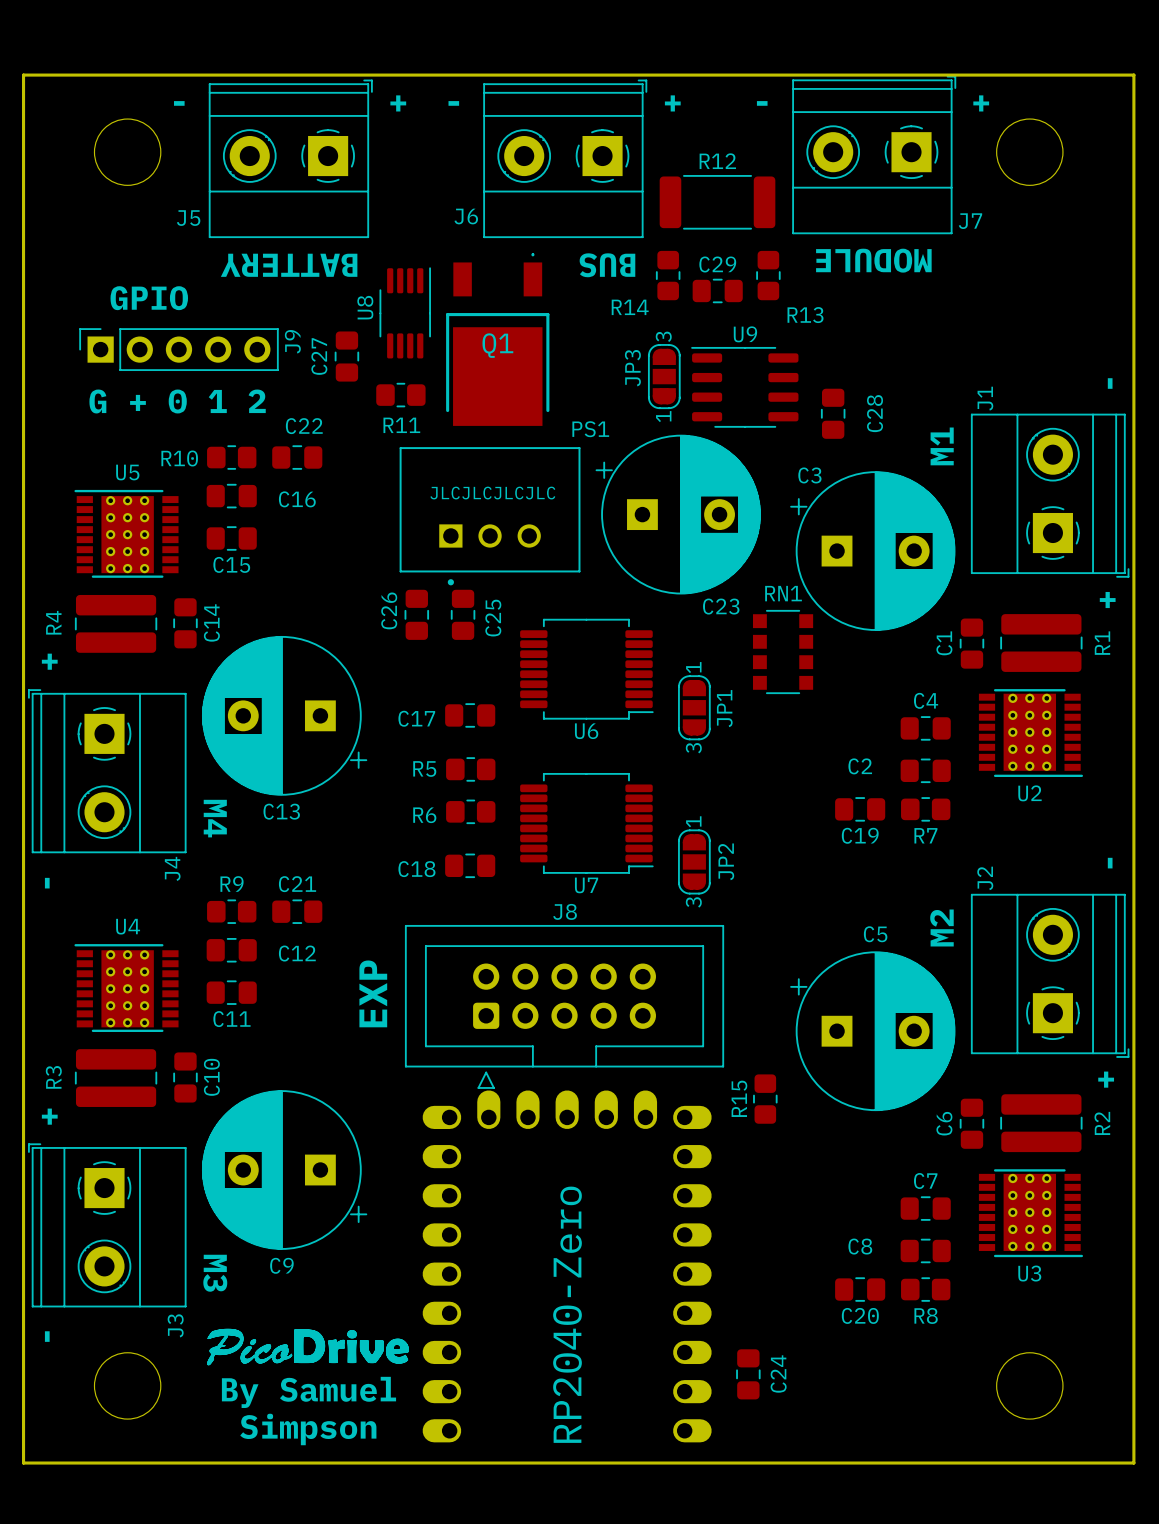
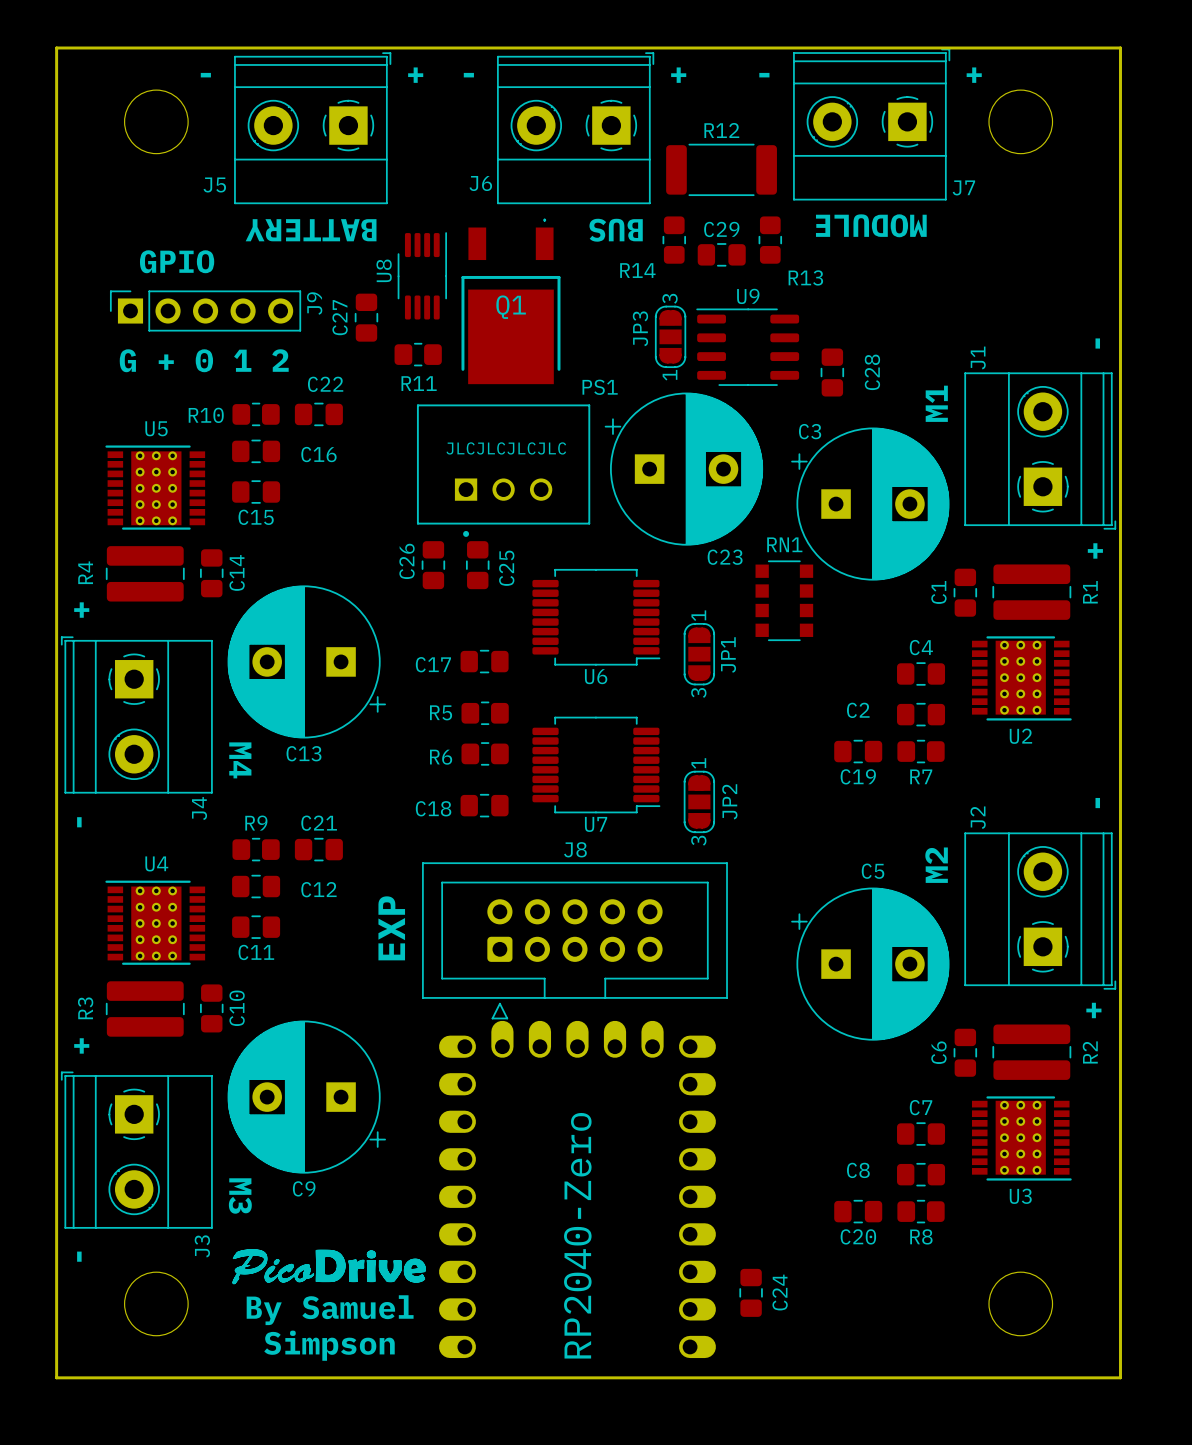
R15: (765, 1099) -> none

